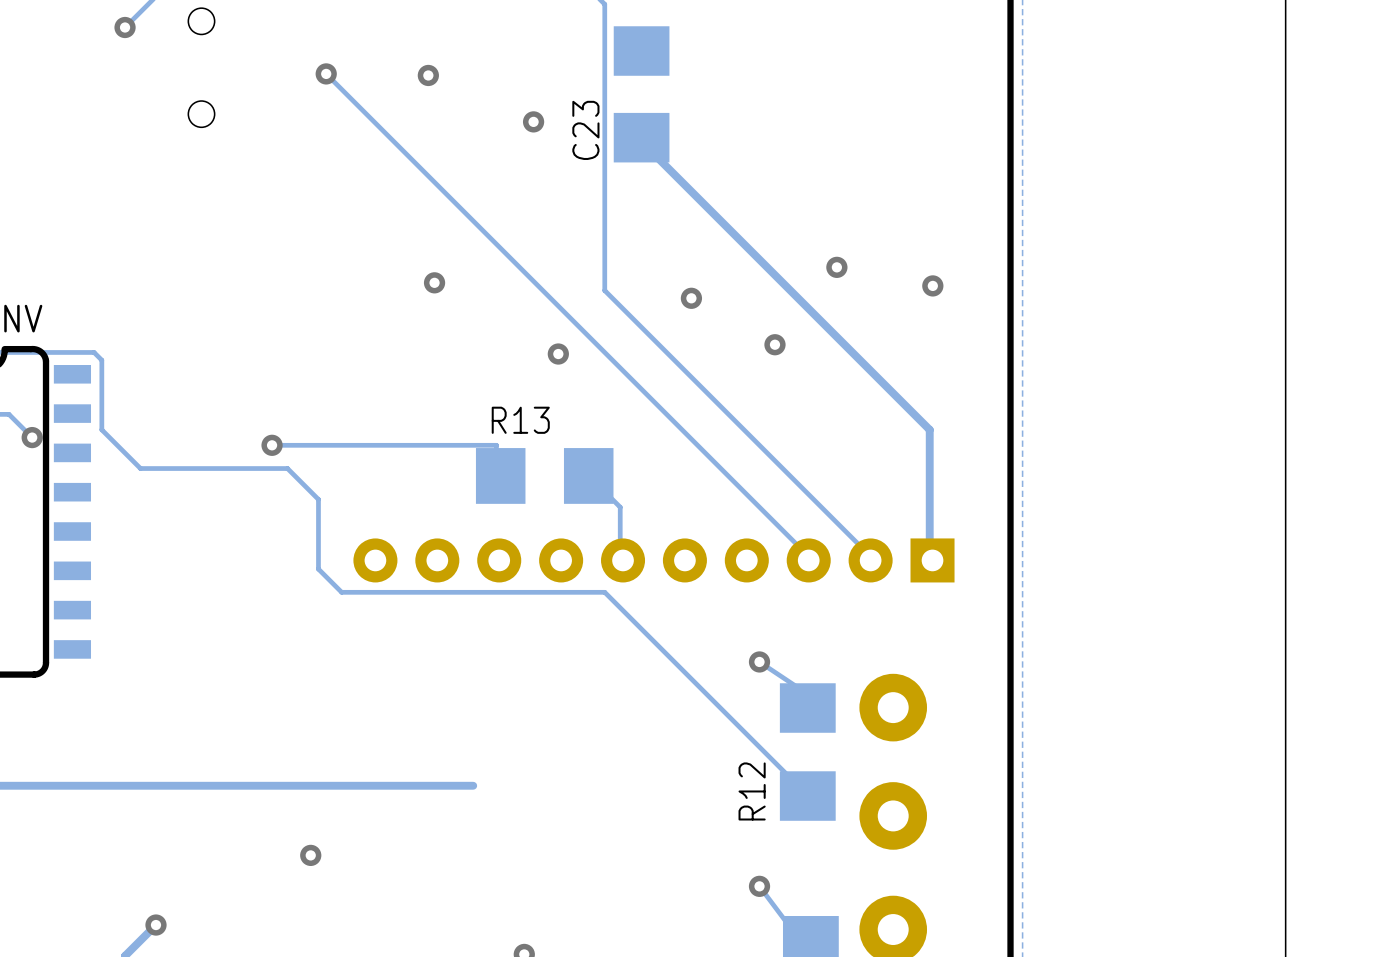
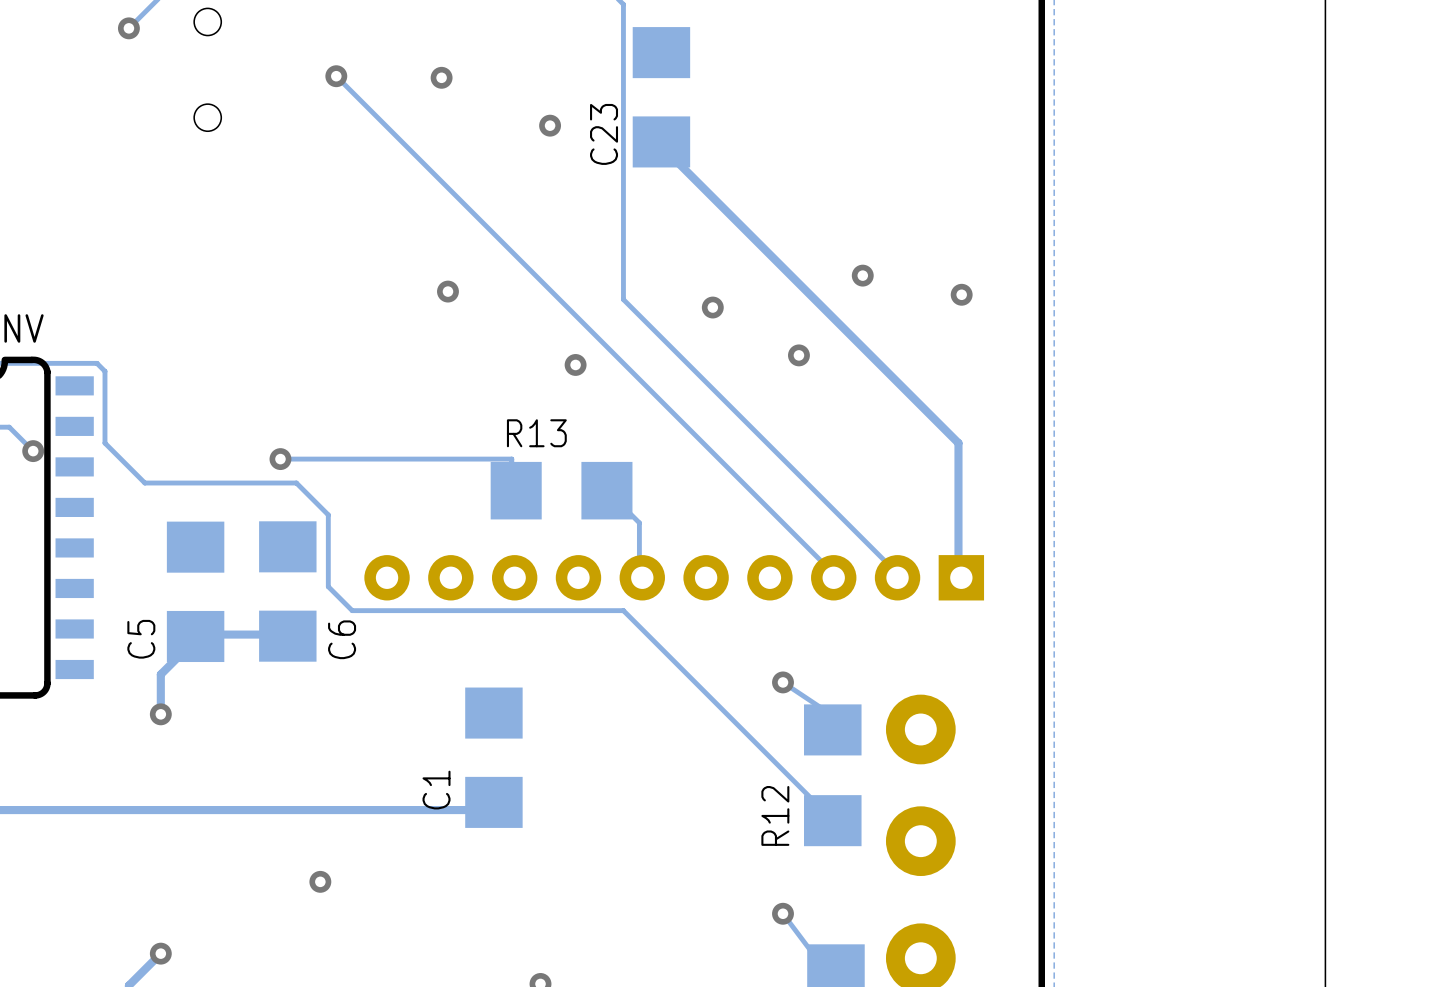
C6: none -> (287, 591)
C5: none -> (195, 591)
track: none -> (287, 636) (200, 634) (195, 636) (192, 642) (160, 674) (160, 714)
via: none -> (160, 714)
C1: none -> (493, 757)

